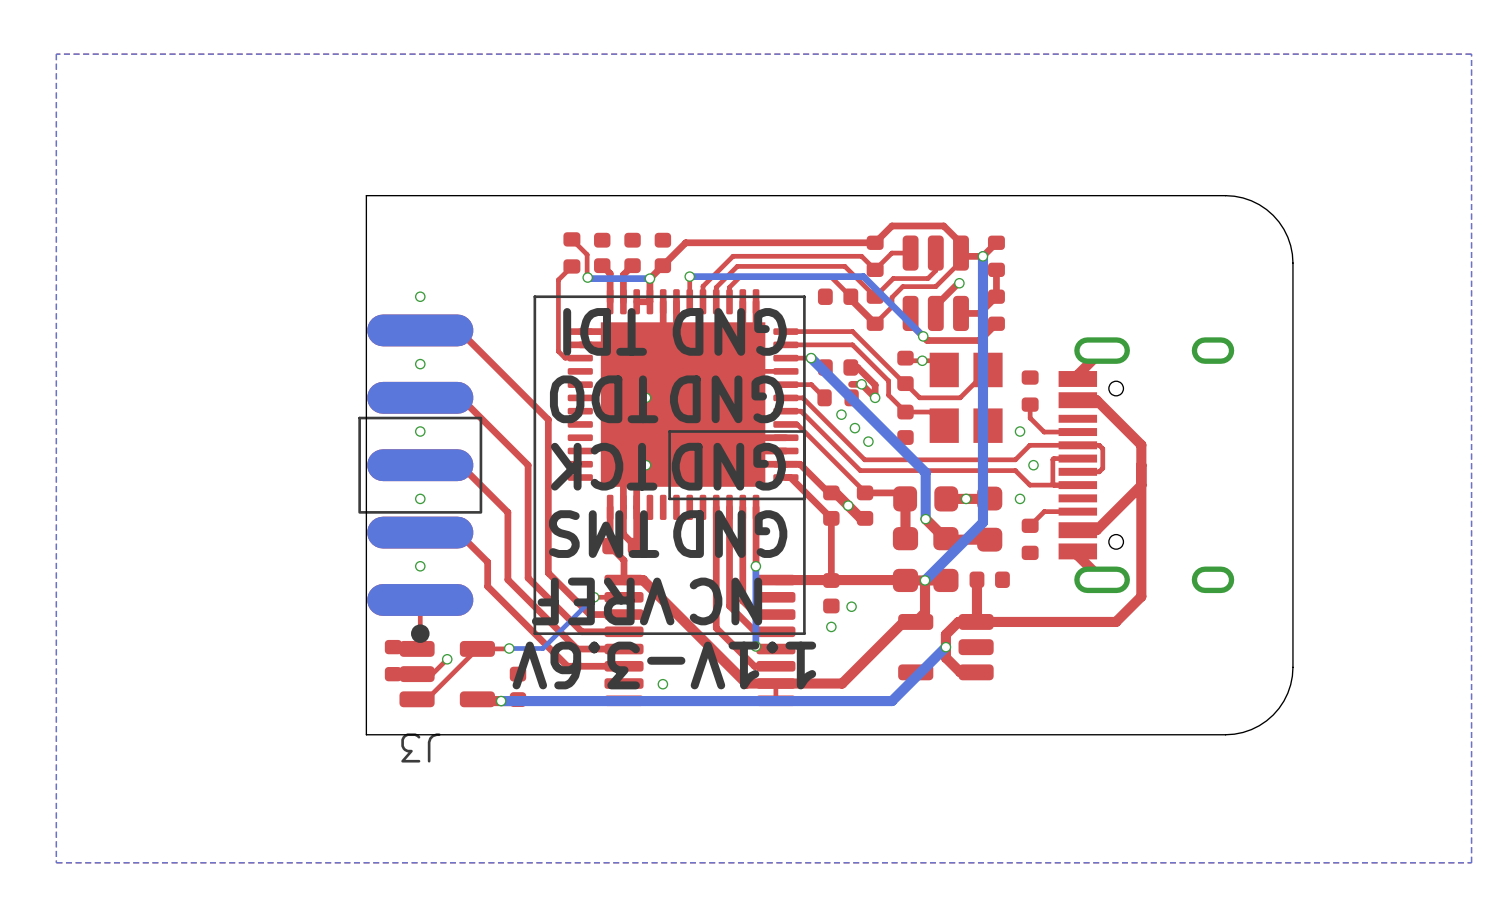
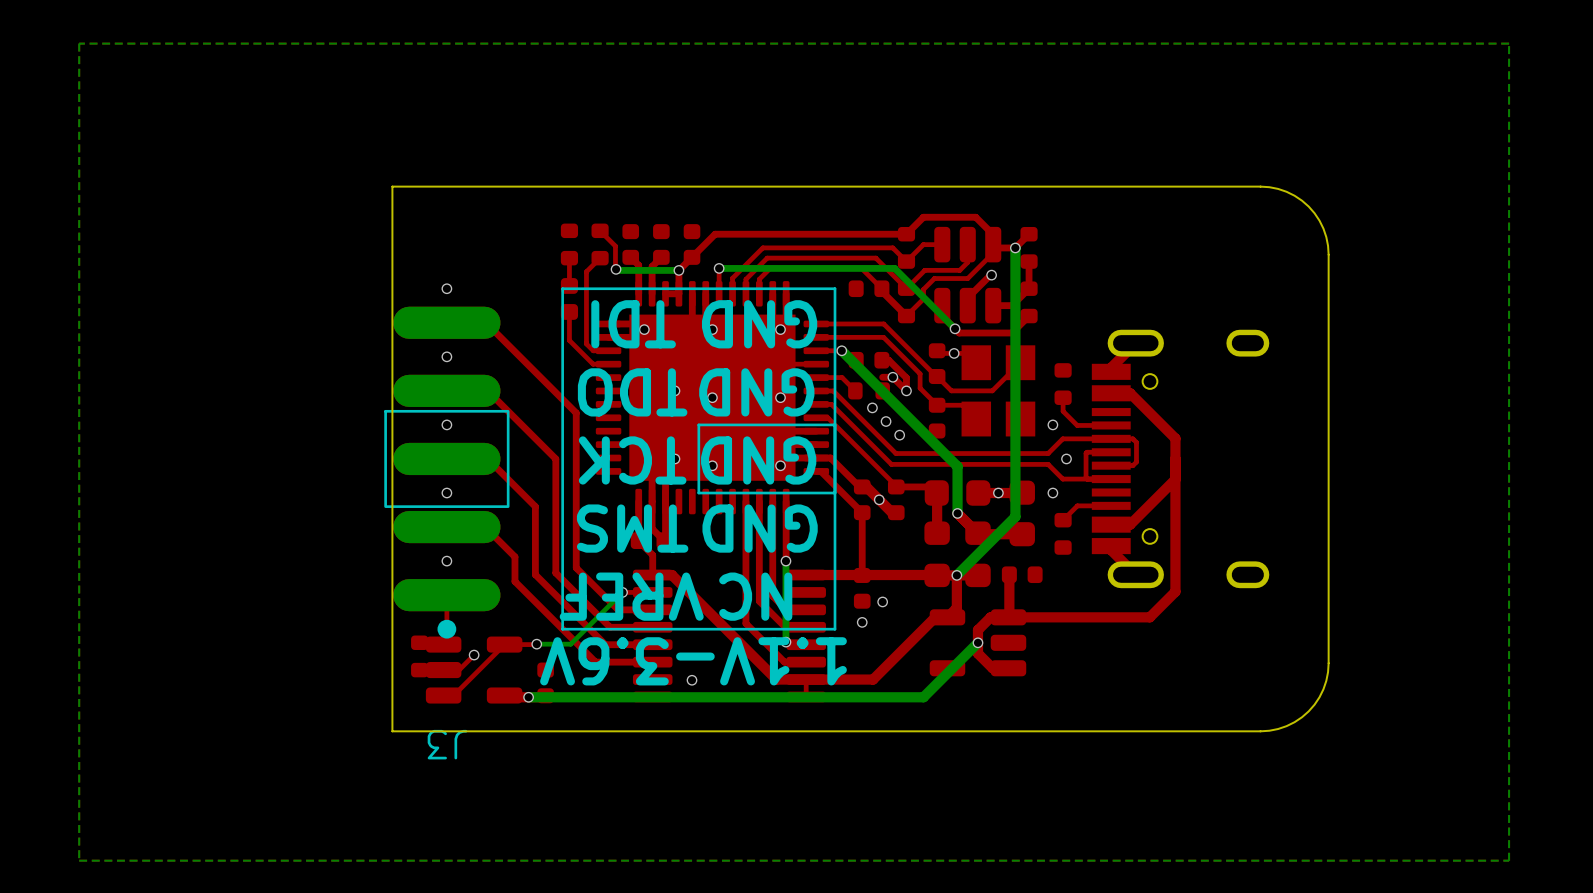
part: none -> (569, 244)
top track: none -> (569, 258) (569, 285)
part: none -> (569, 298)
top track: none -> (569, 311) (569, 340) (593, 364) (608, 364)
via: none -> (644, 329)
via: none -> (712, 329)
via: none -> (780, 329)
via: none -> (712, 397)
via: none -> (780, 397)
via: none -> (712, 465)
via: none -> (780, 465)

